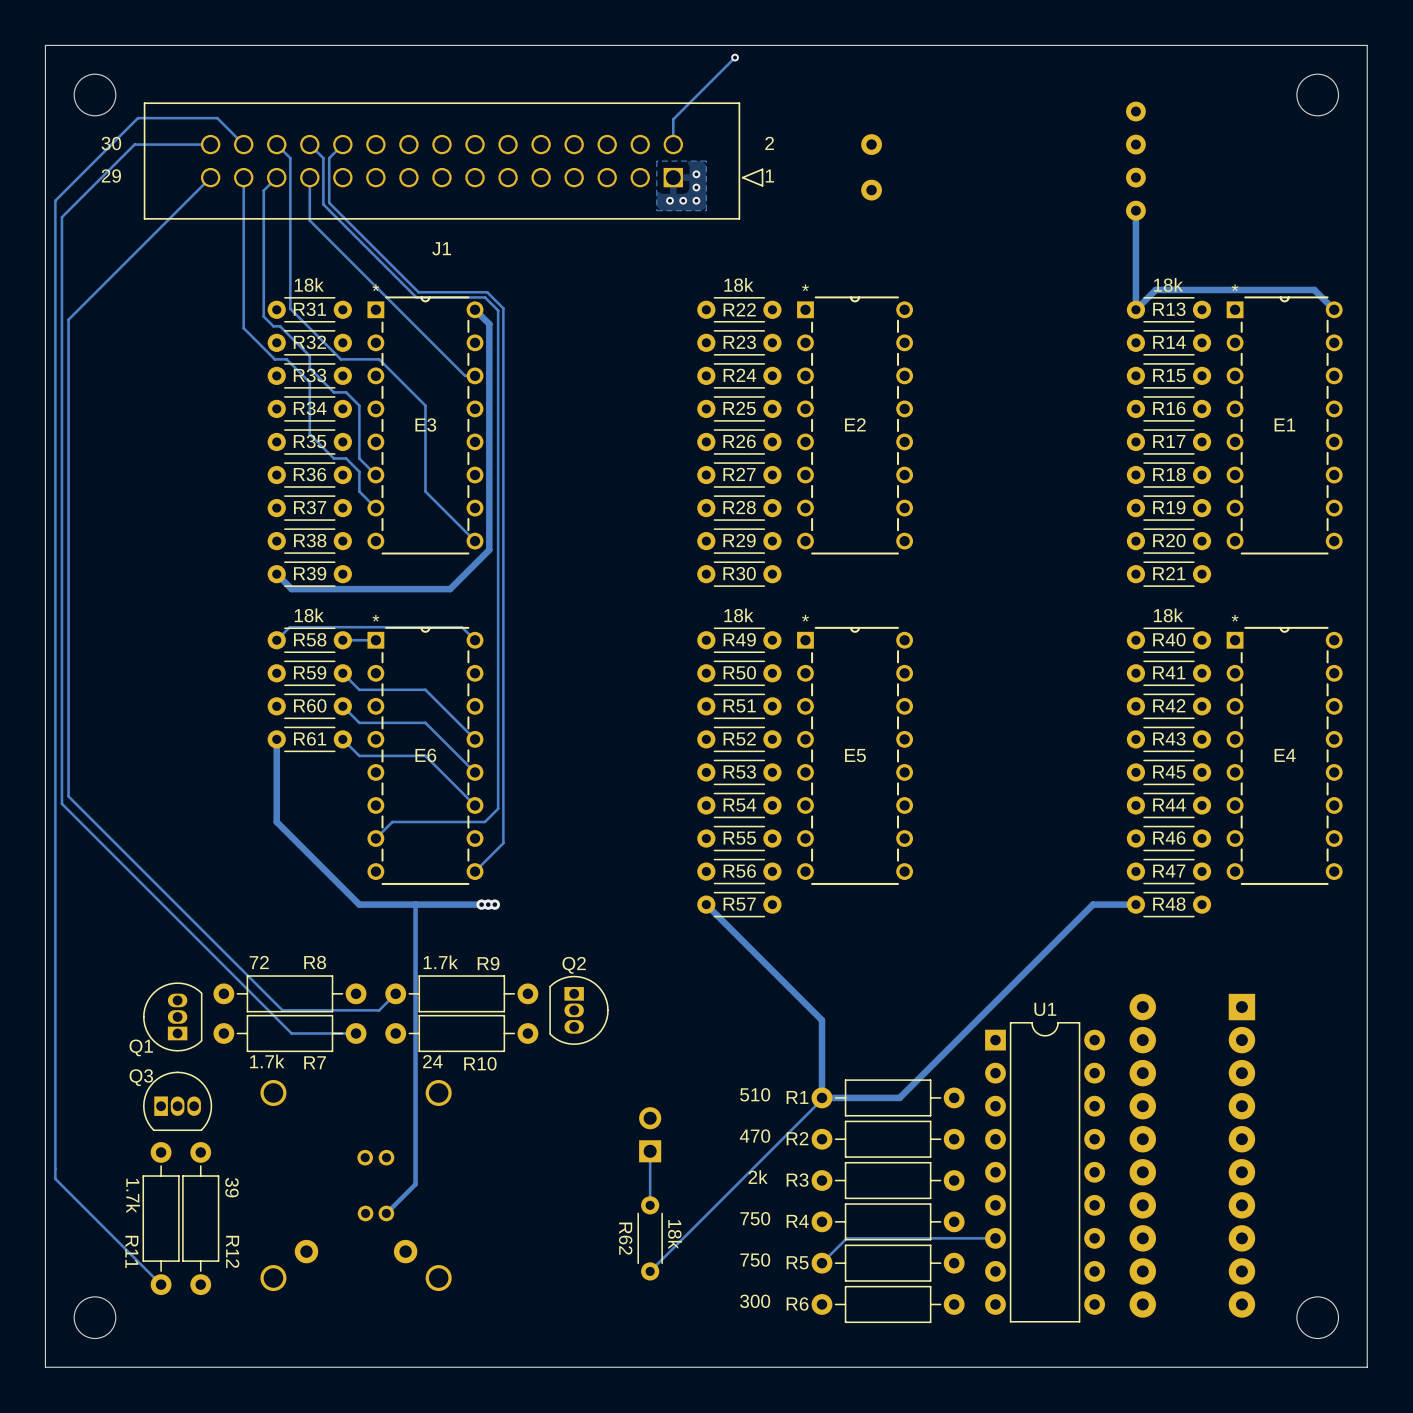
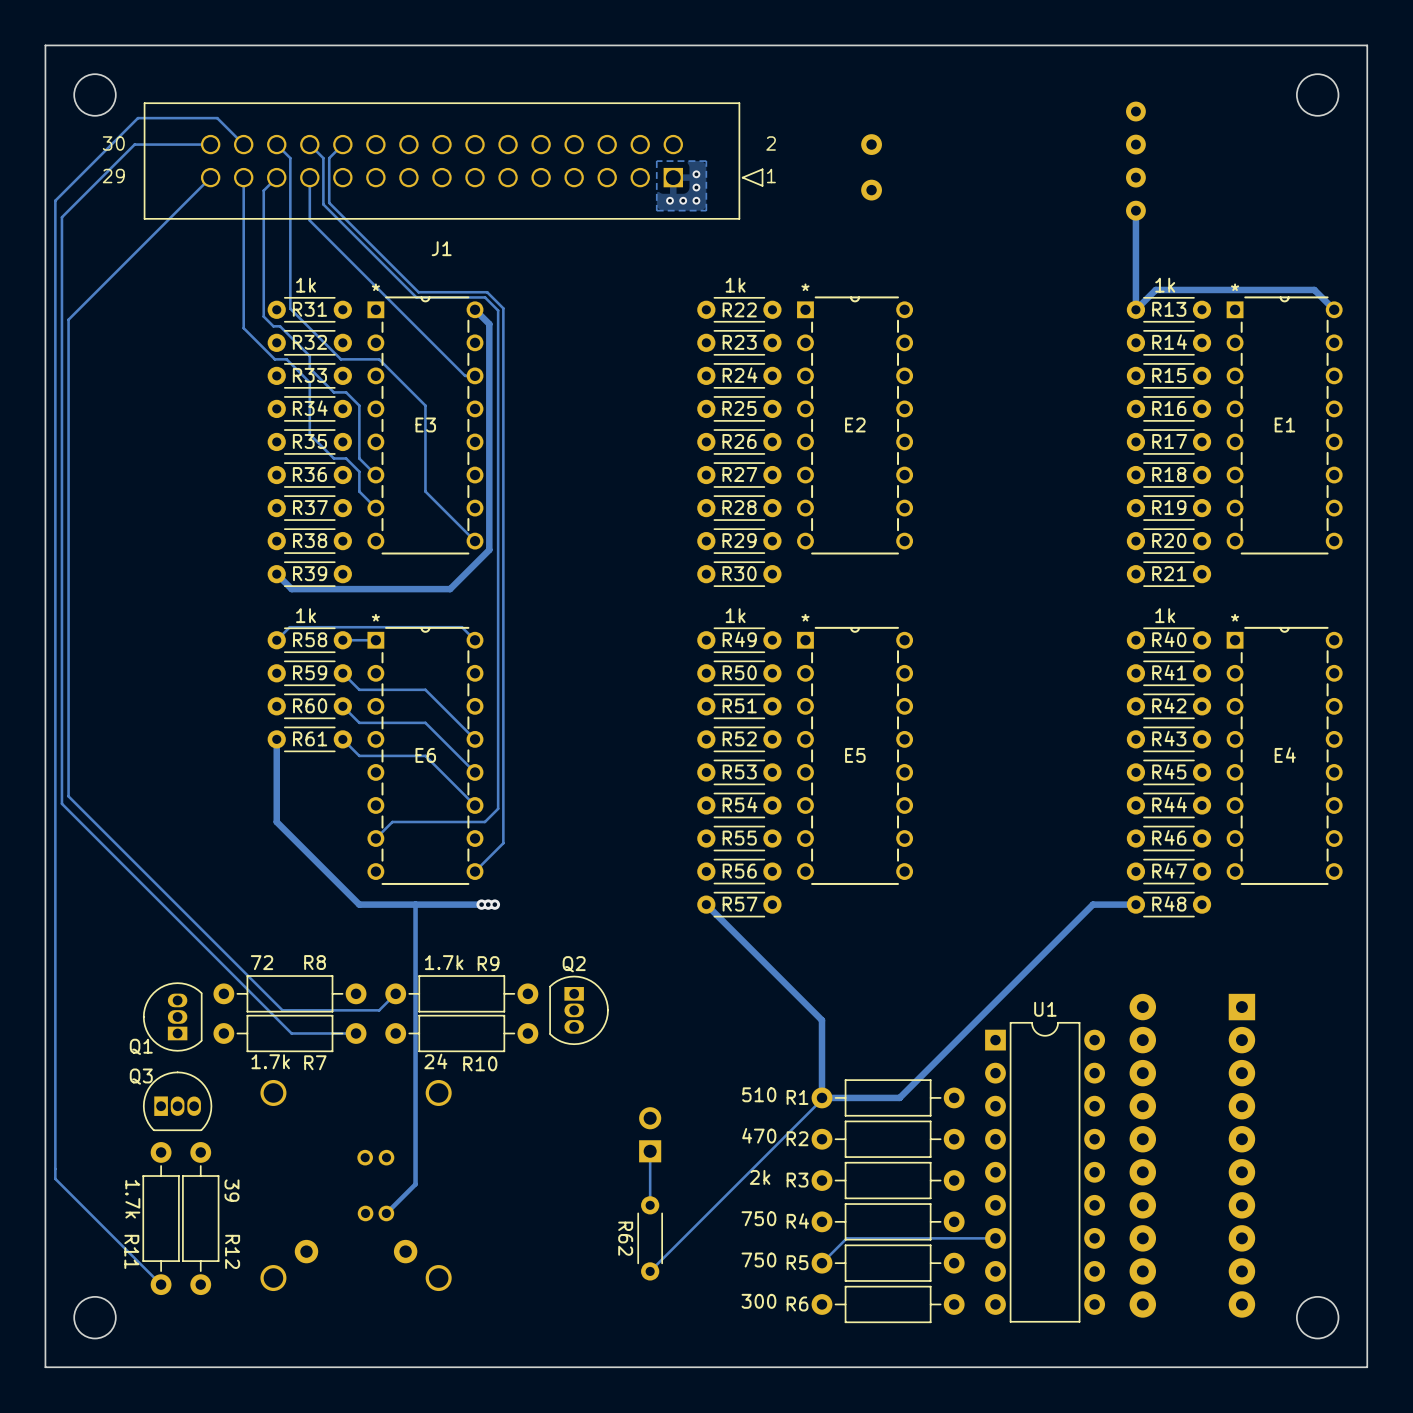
track: (735, 57) (673, 119) (673, 144) -> none
via: (735, 57) -> none
text: 18k (309, 284) -> 1k (306, 285)
text: 18k (738, 284) -> 1k (735, 285)
text: 18k (1168, 284) -> 1k (1165, 285)
text: 18k (309, 615) -> 1k (306, 615)
text: 18k (738, 615) -> 1k (735, 615)
text: 18k (1168, 615) -> 1k (1165, 615)
text: 18k (675, 1234) -> none

